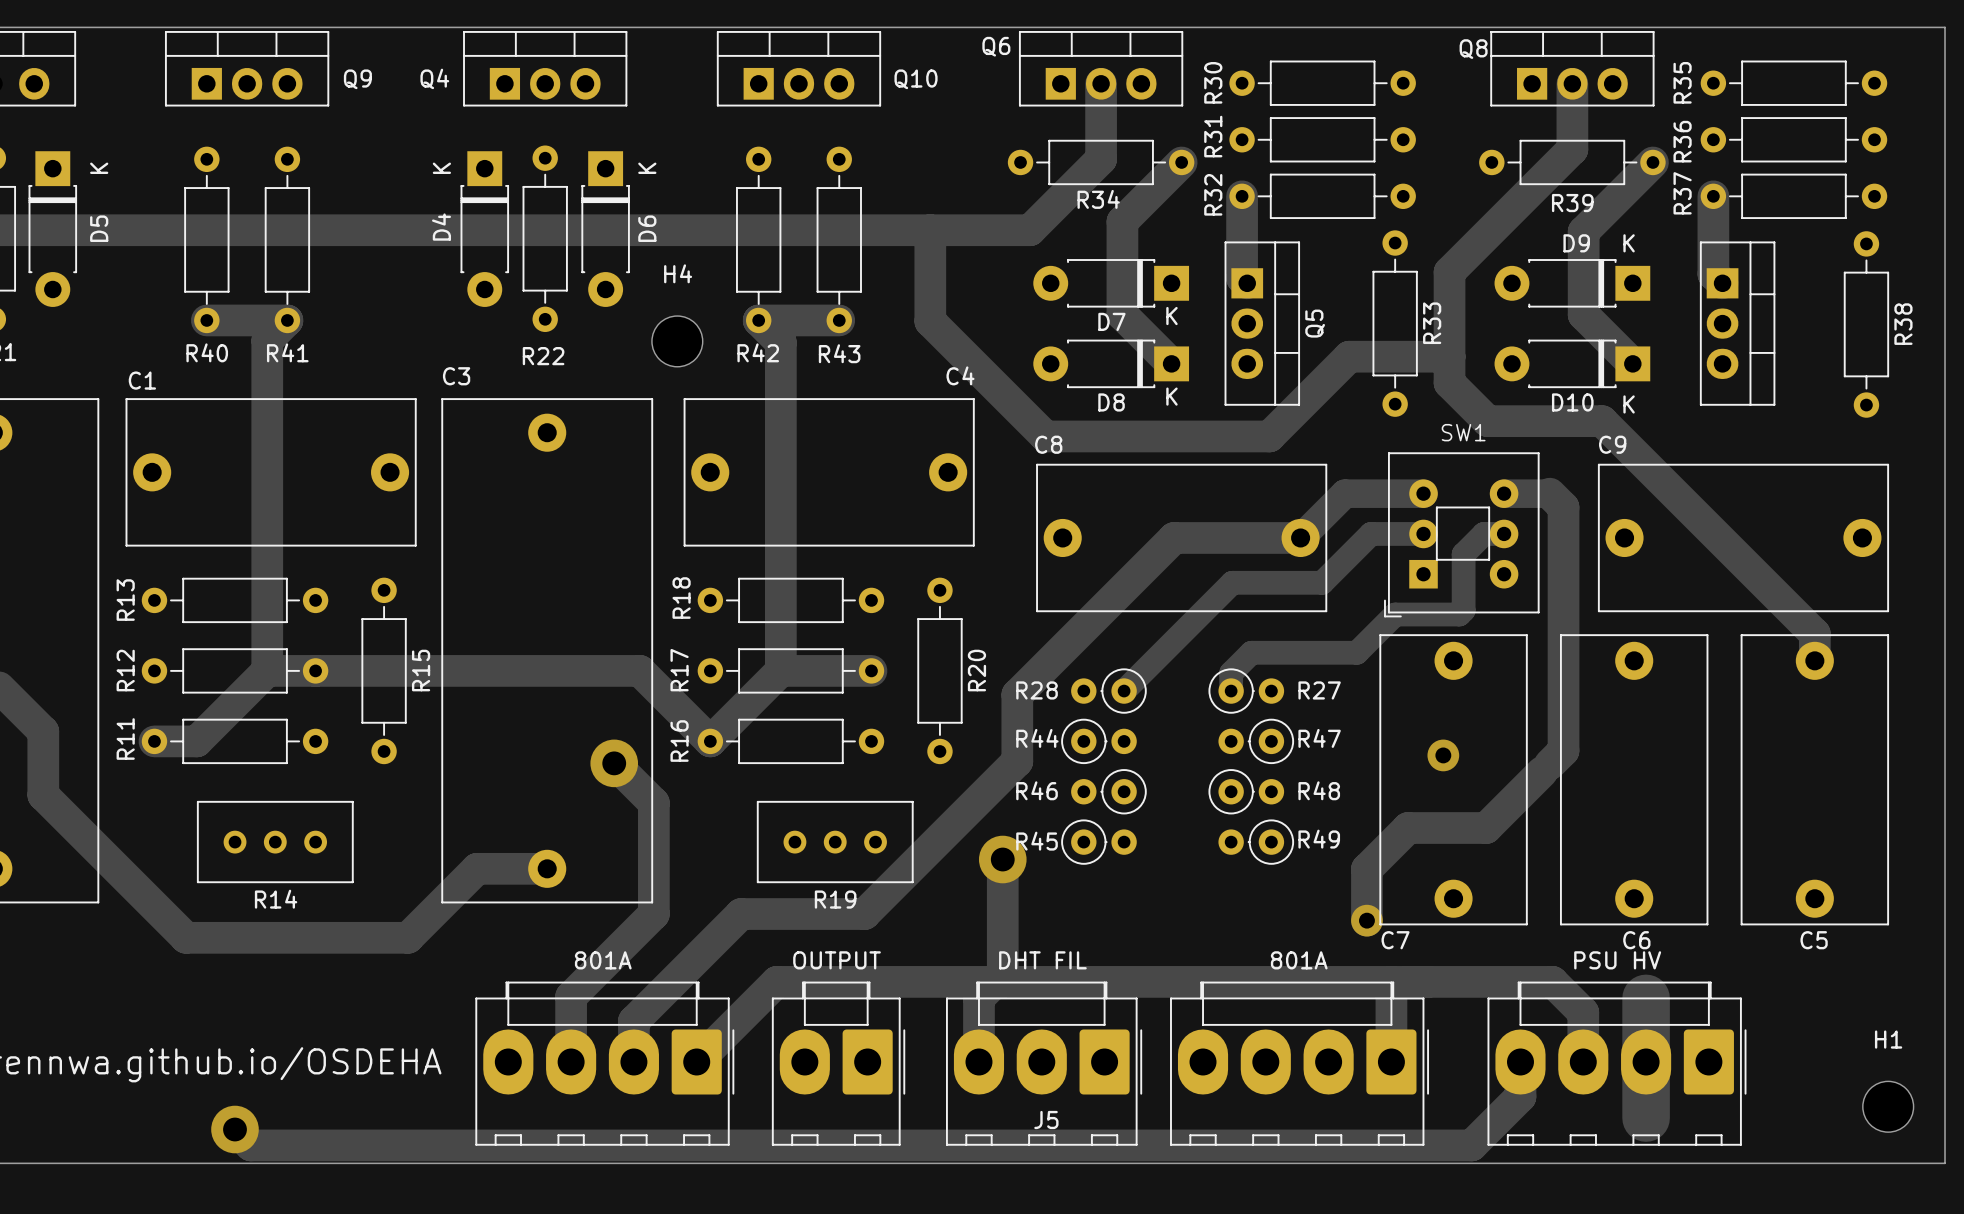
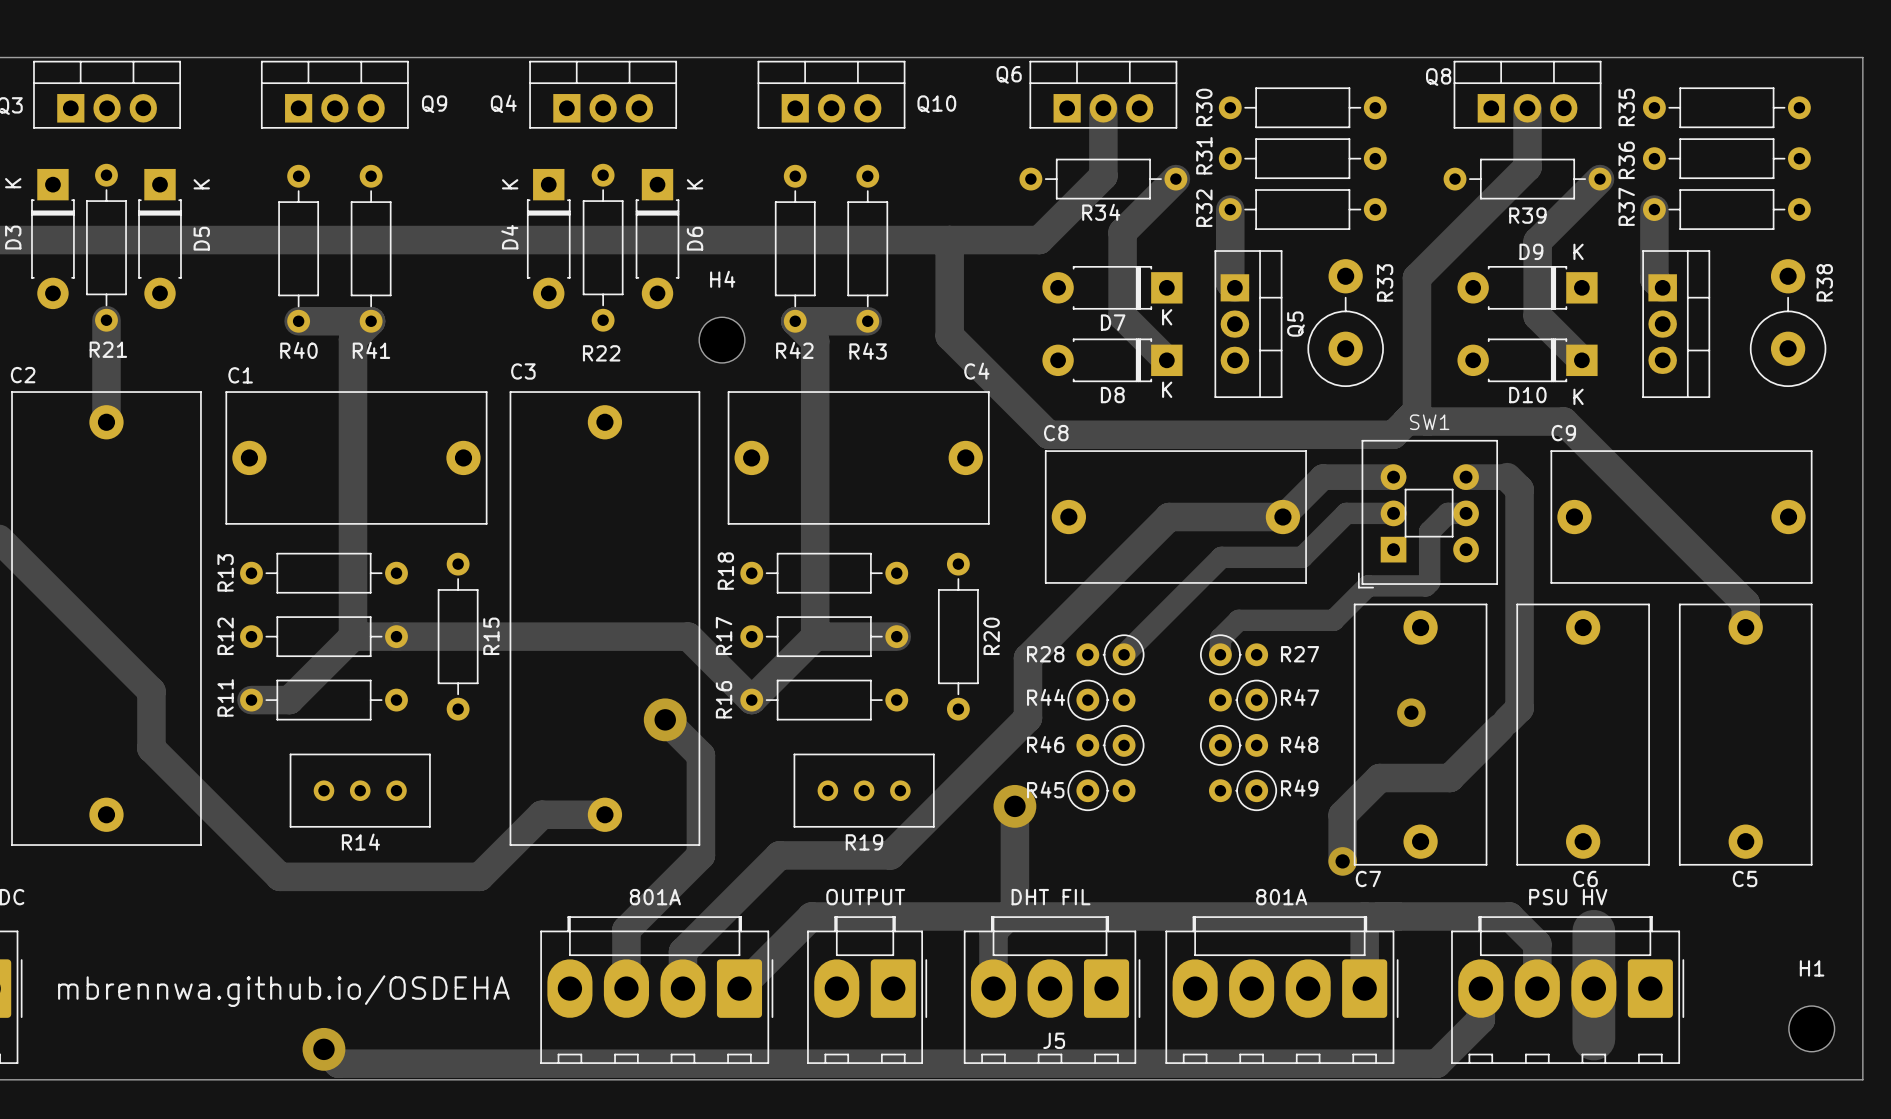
R33 footprint: [1372, 230, 1418, 417] -> [1307, 259, 1384, 388]
R38 footprint: [1843, 231, 1890, 418] -> [1749, 259, 1827, 388]
track: (930, 321) (1045, 436) (1269, 436) (1349, 356) (1449, 356) -> (949, 321) (949, 336) (1048, 434) (1393, 434) (1416, 411) (1416, 377)
R33 name position: R33 (1432, 323) -> R33 (1385, 282)
R38 name position: R38 (1903, 324) -> R38 (1824, 282)
track: (1449, 382) (1487, 421) (1602, 421) (1612, 431) -> (1427, 421) (1563, 421)

